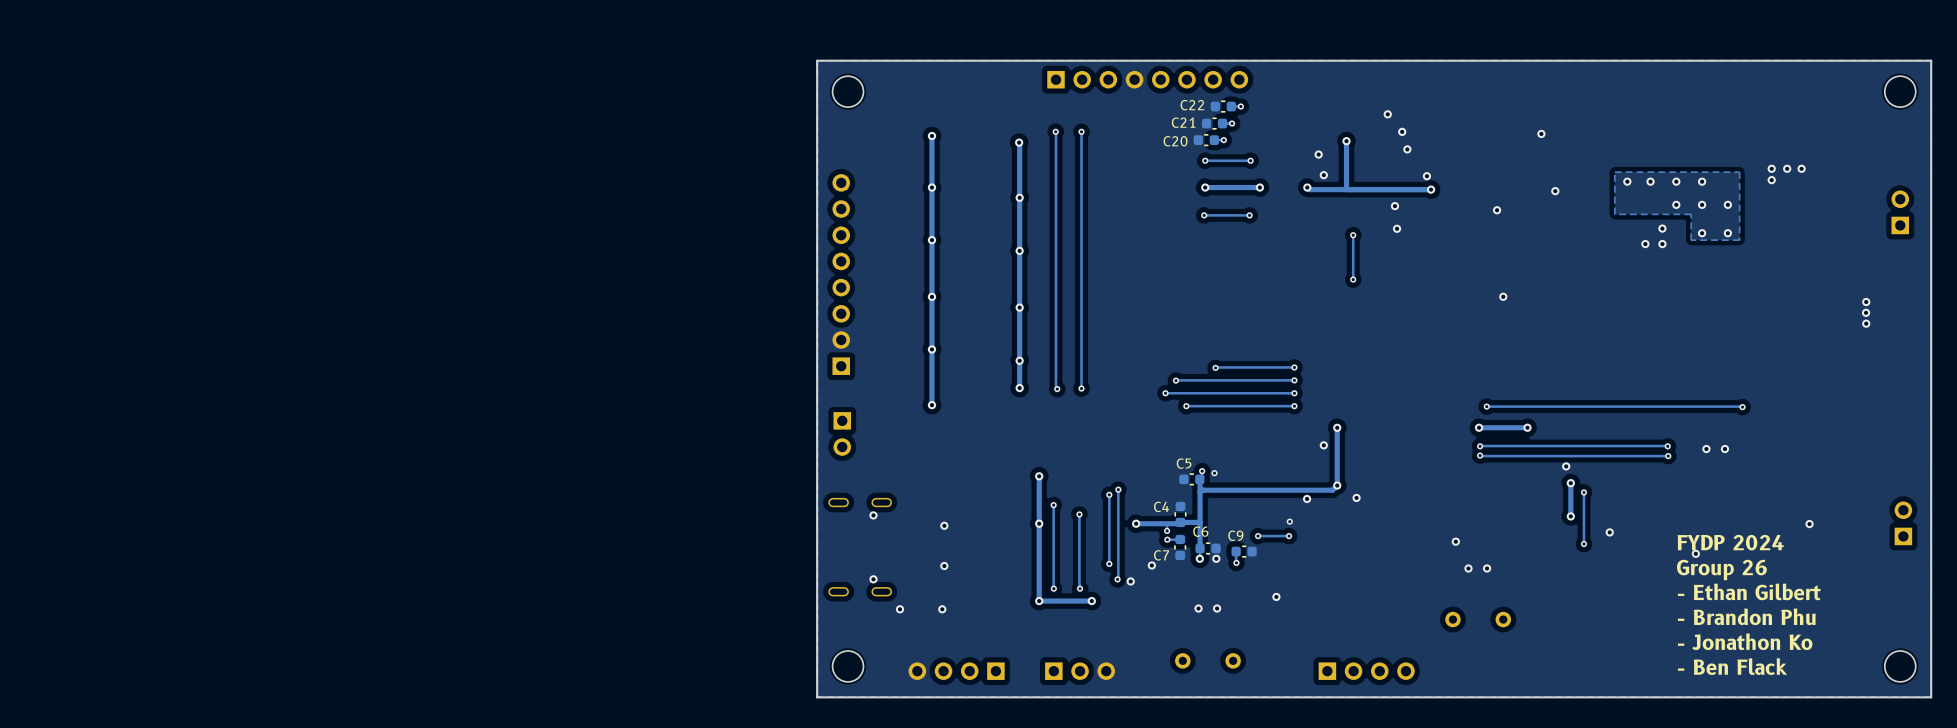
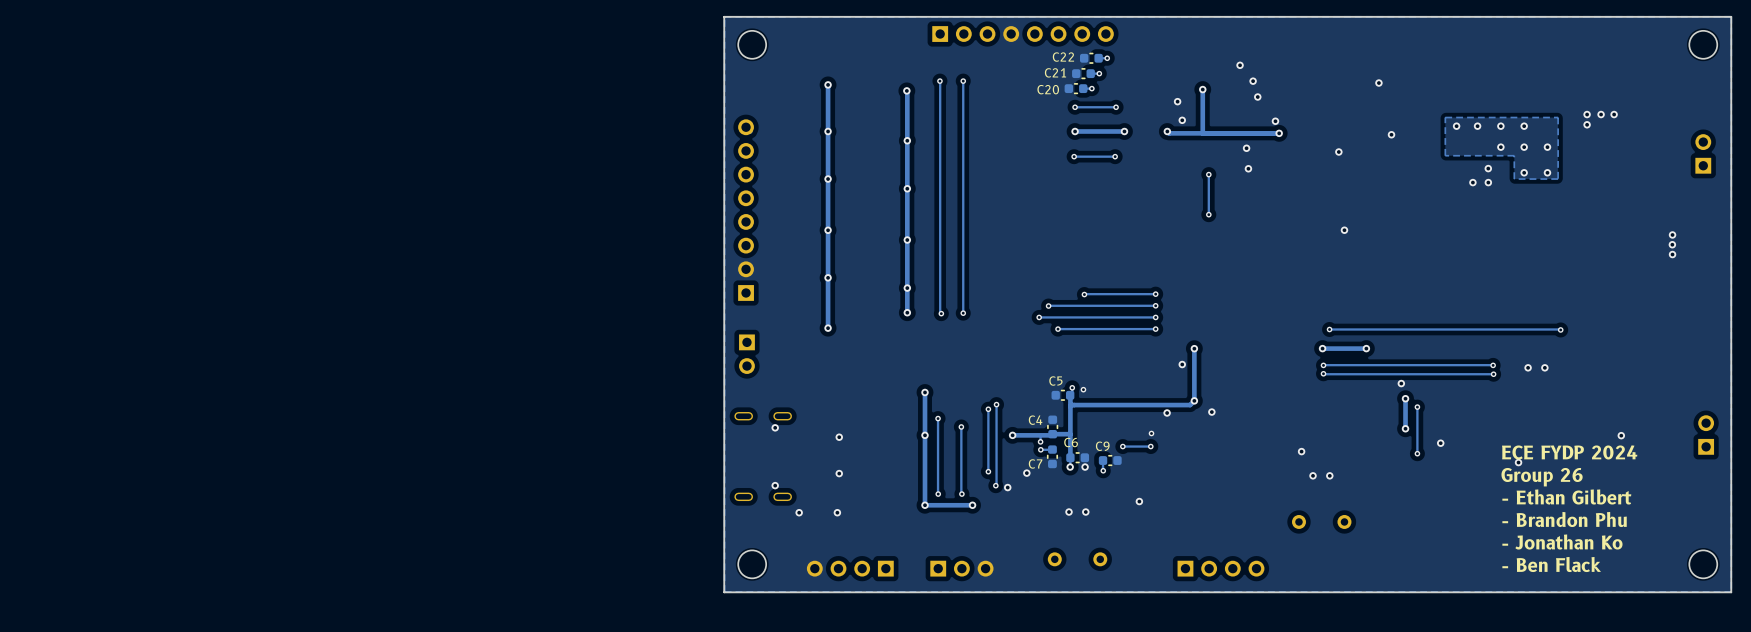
text: FYDP 2024 (1730, 542) -> ECE FYDP 2024 (1569, 452)
text: - Jonathon Ko (1745, 641) -> - Jonathan Ko (1562, 542)

